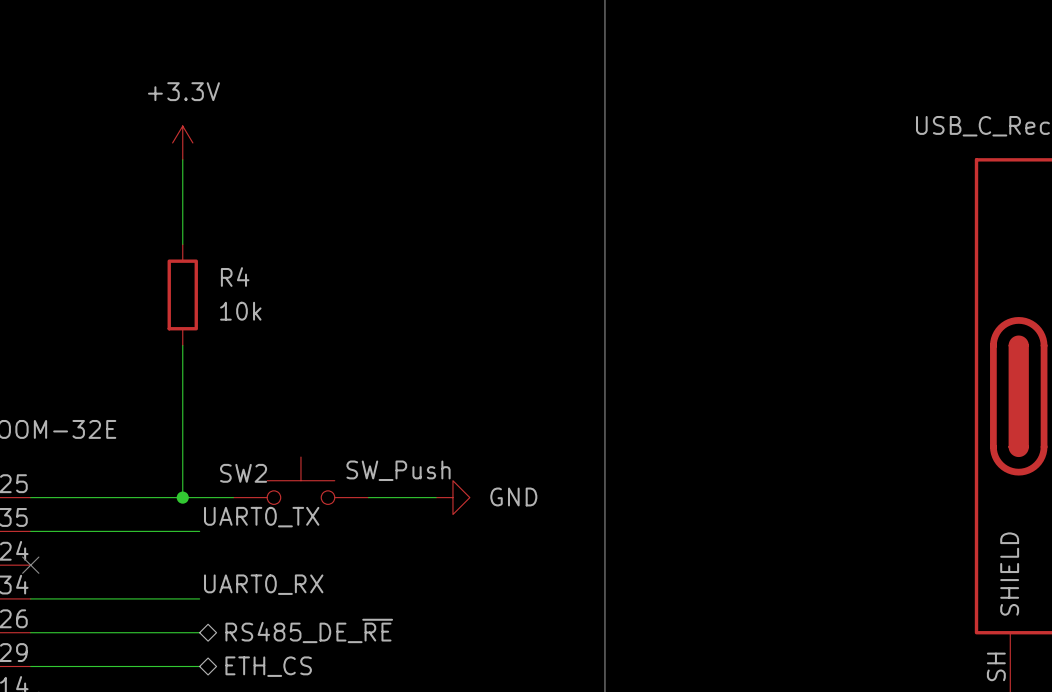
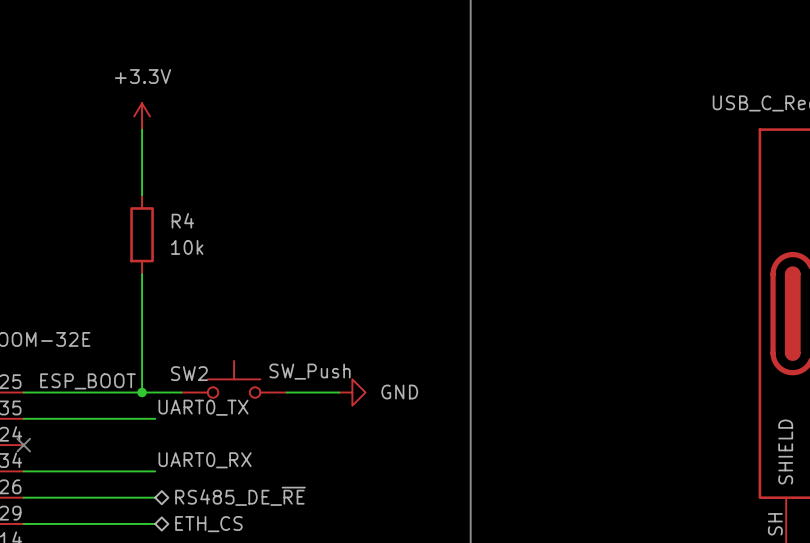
label: none -> ESP_BOOT (88, 381)

